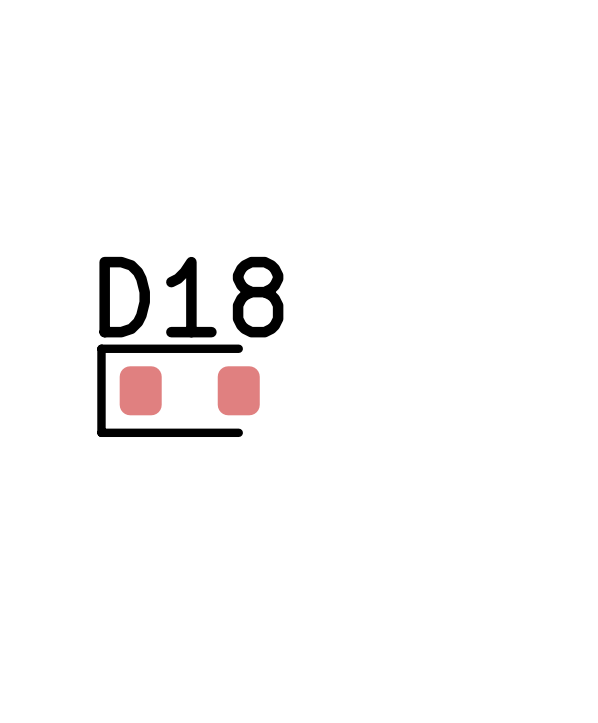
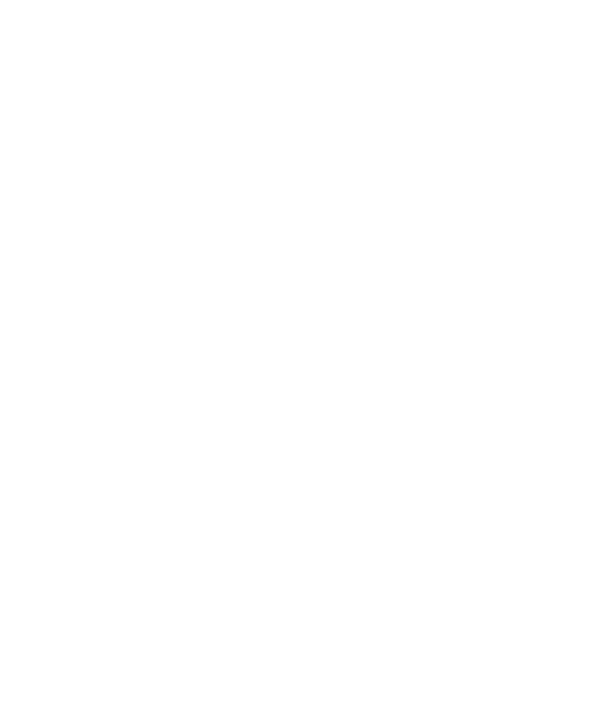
D18: (178, 390) -> none

